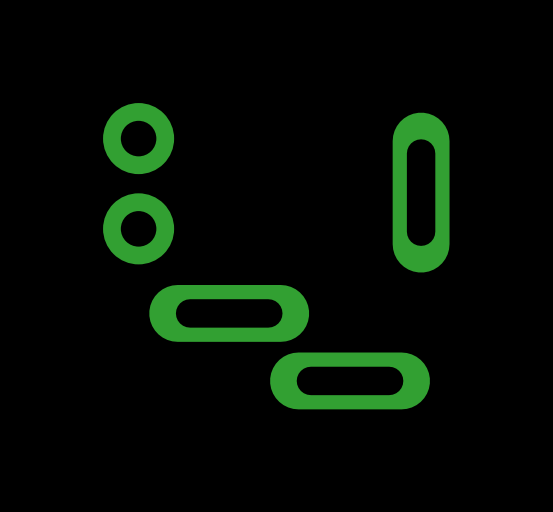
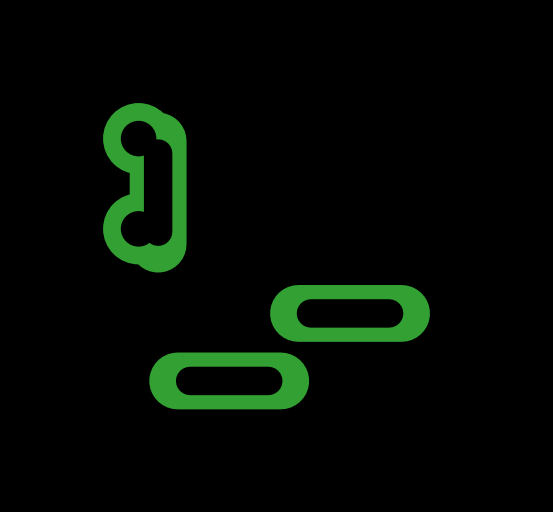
part footprint: [149, 112, 450, 410] -> [129, 112, 430, 410]

